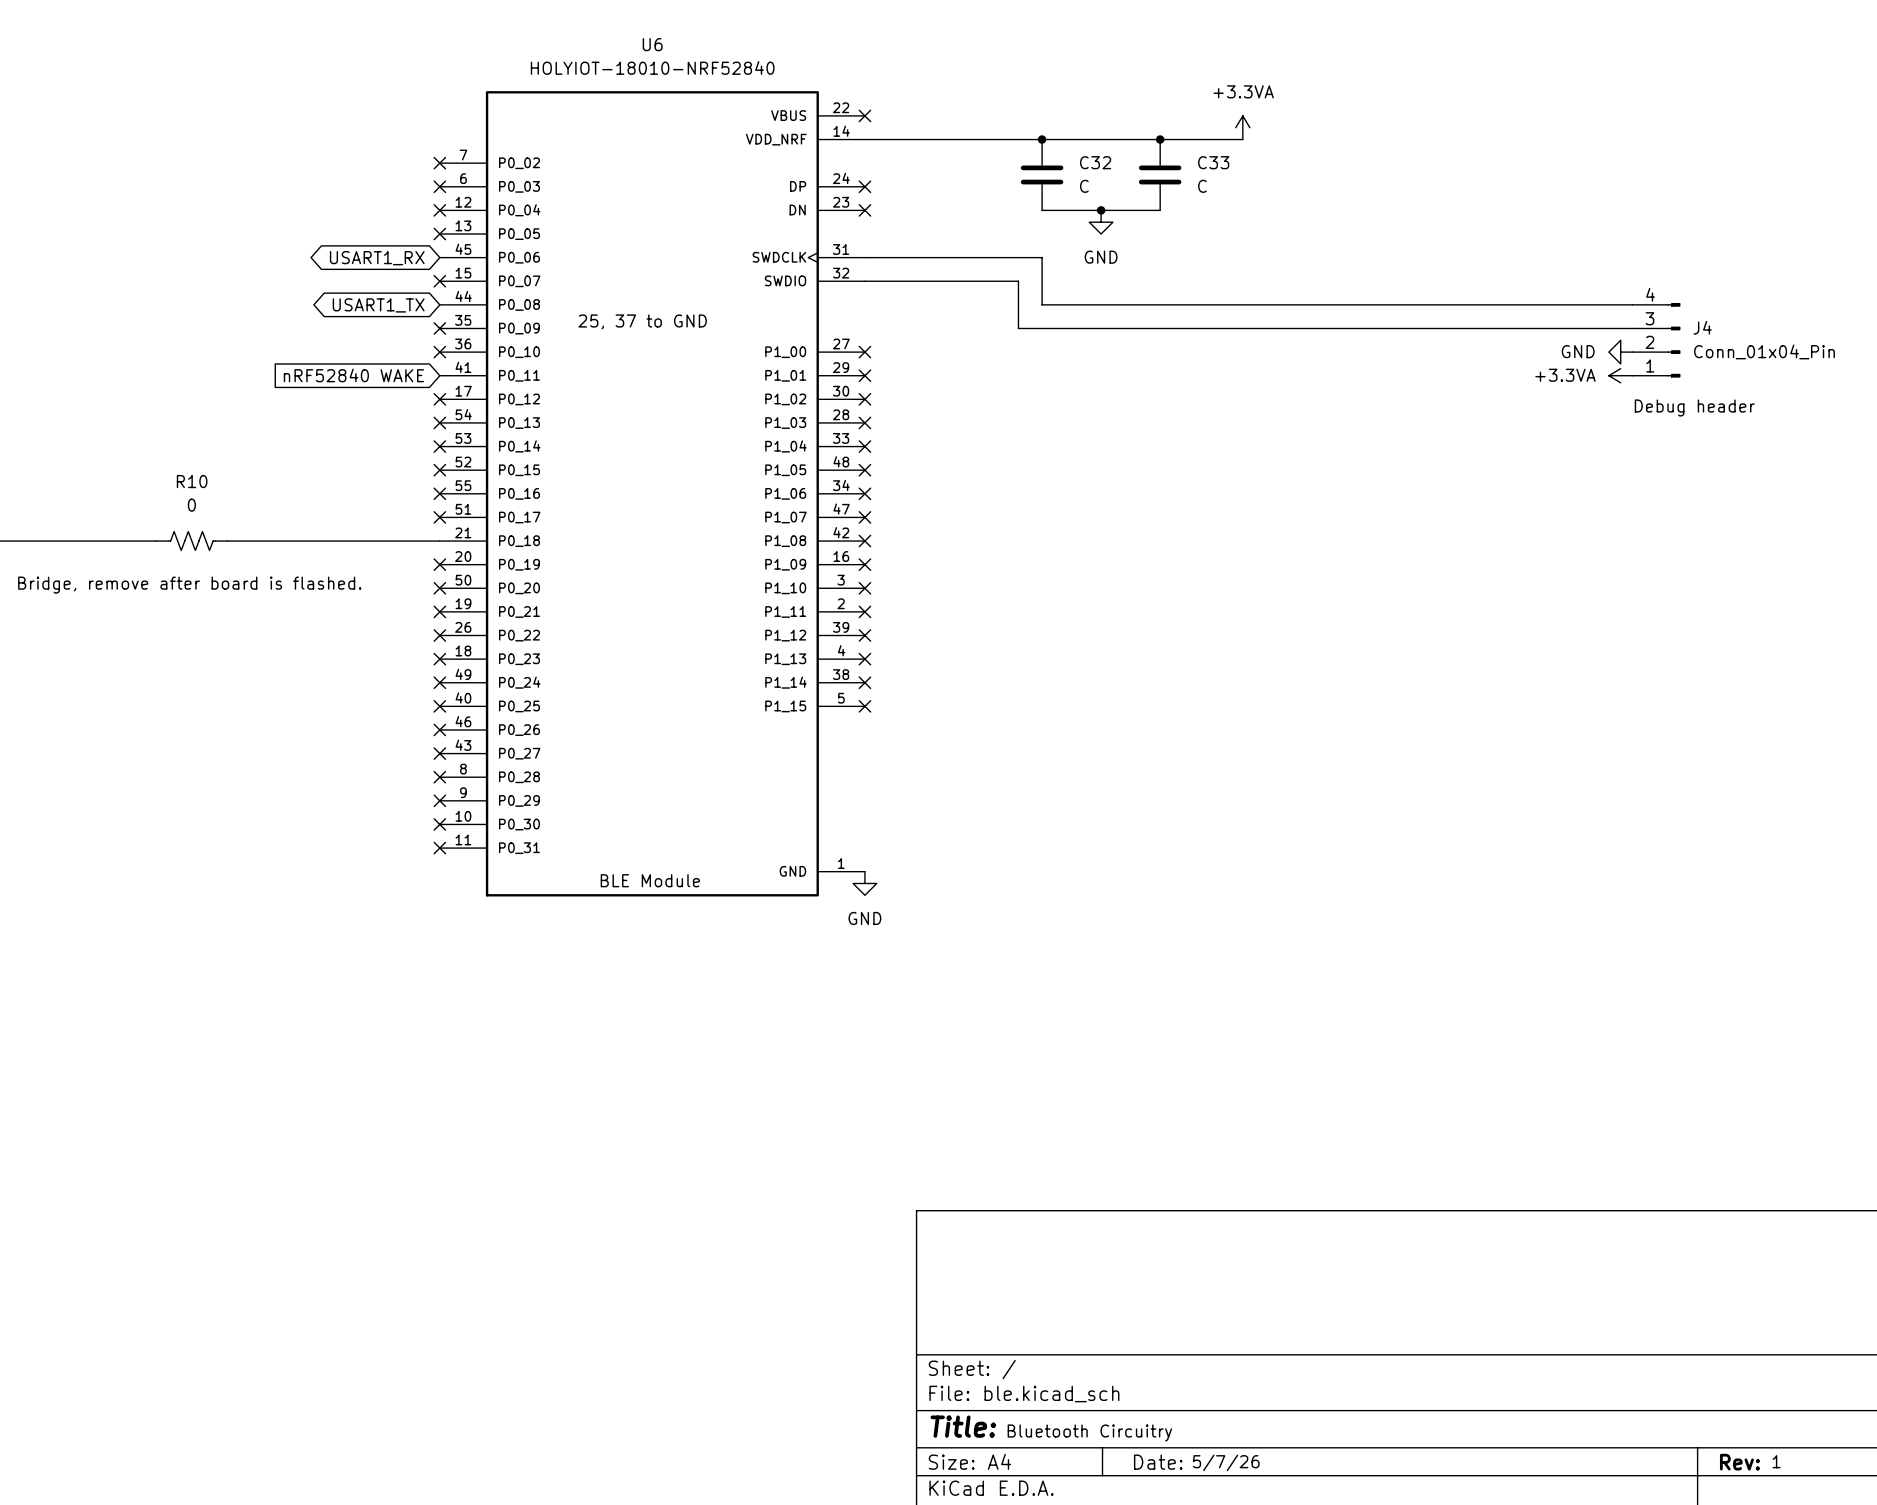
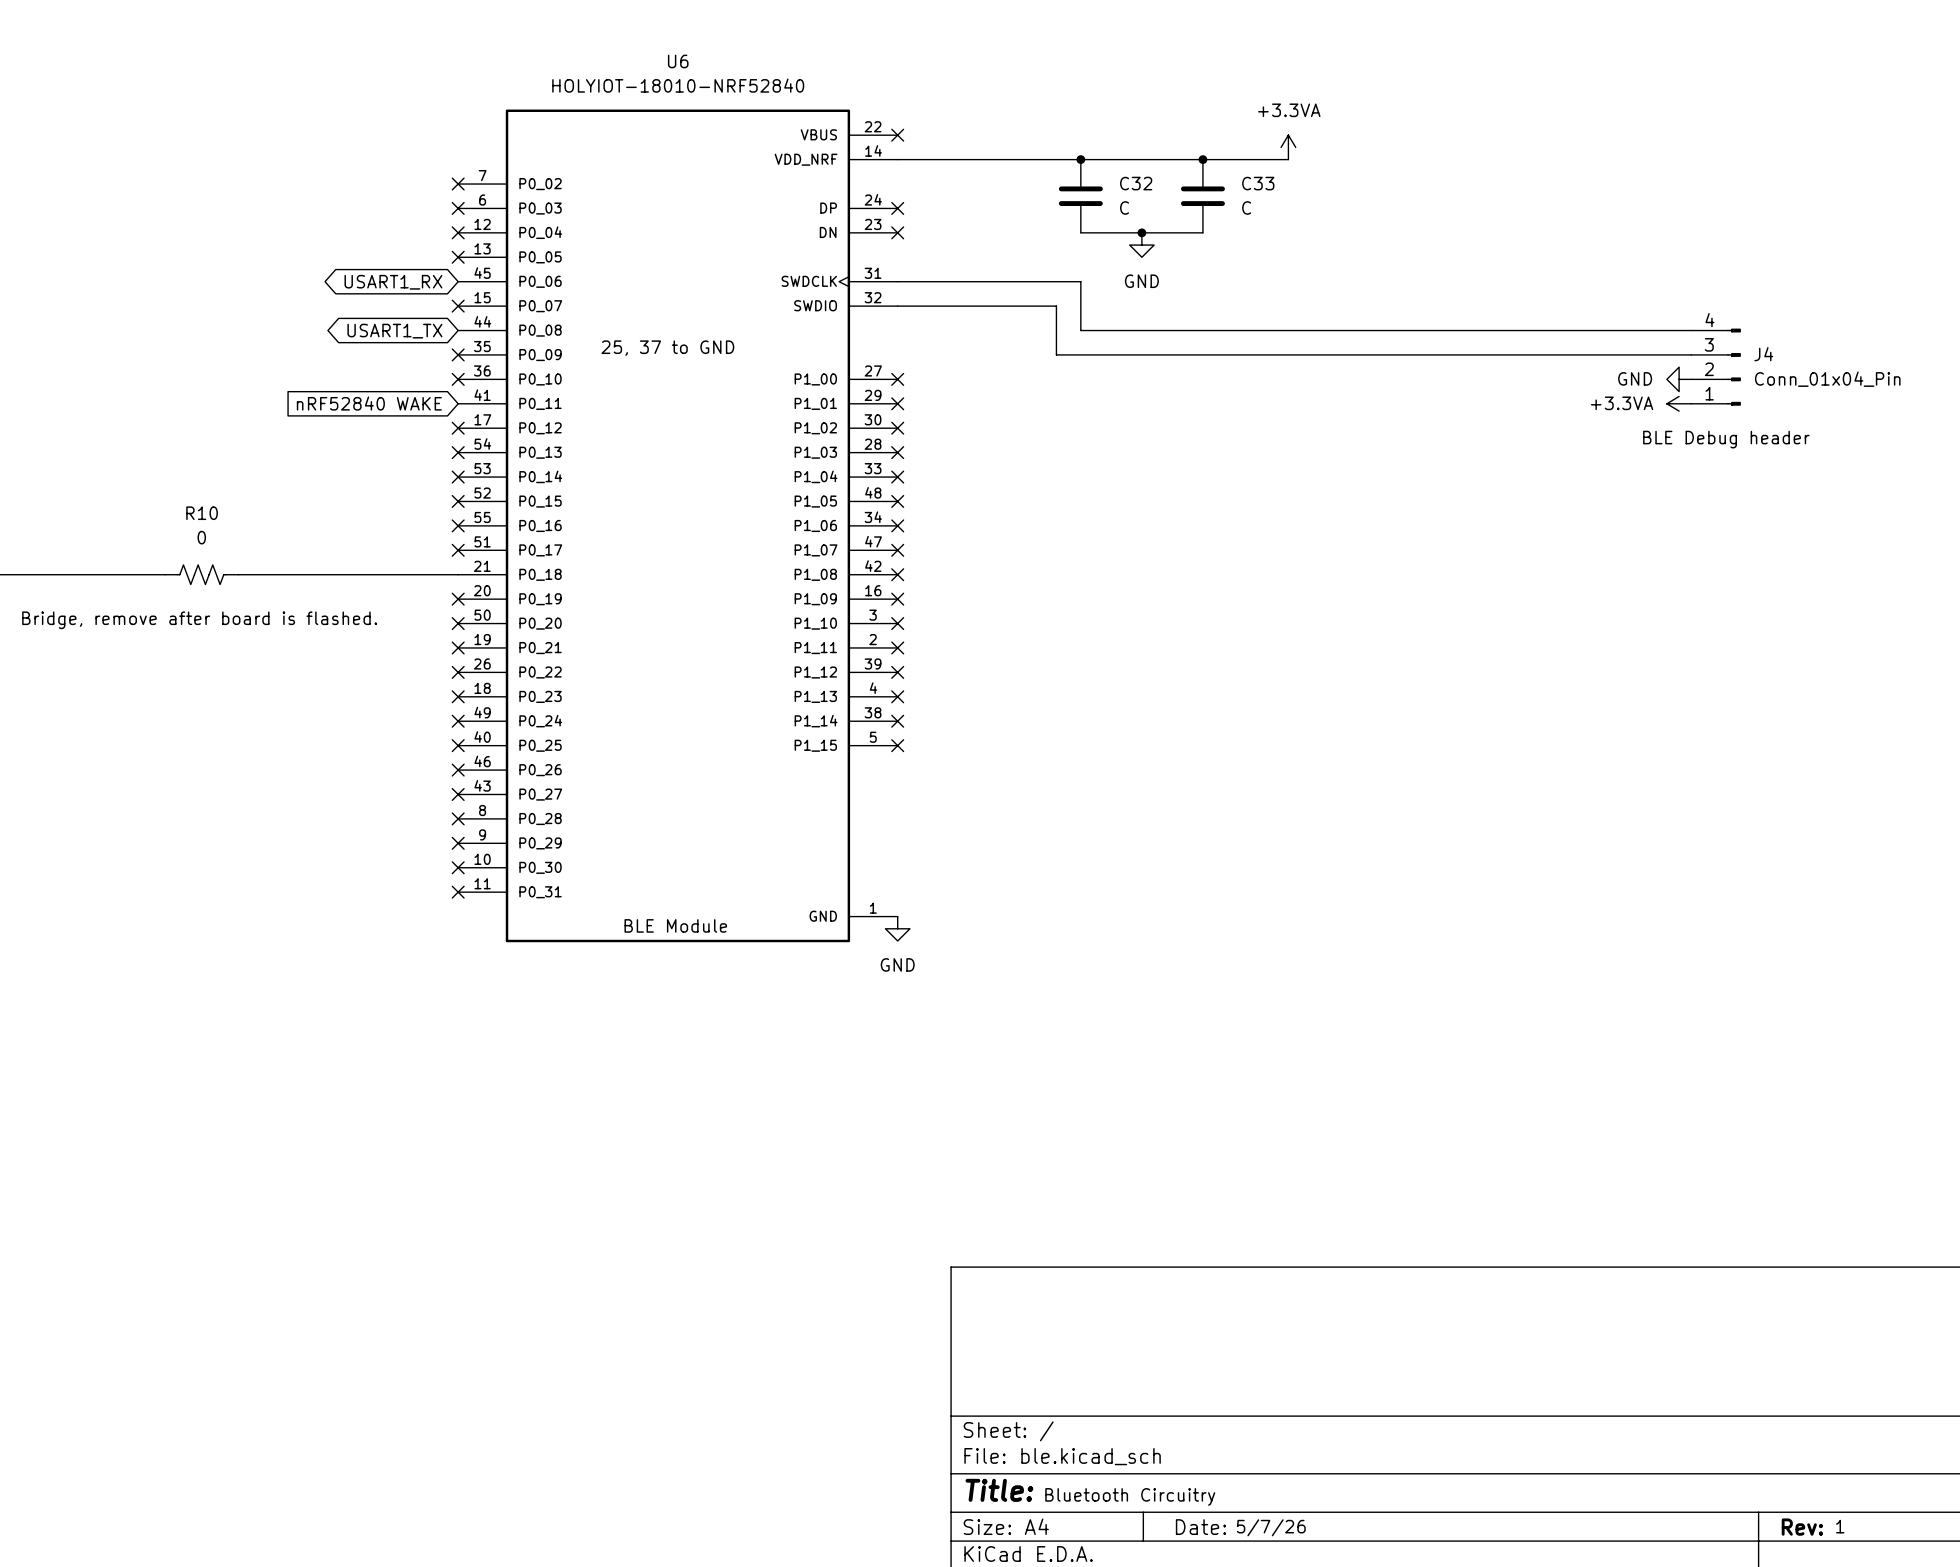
text: Debug header (1694, 407) -> BLE Debug header (1726, 439)

